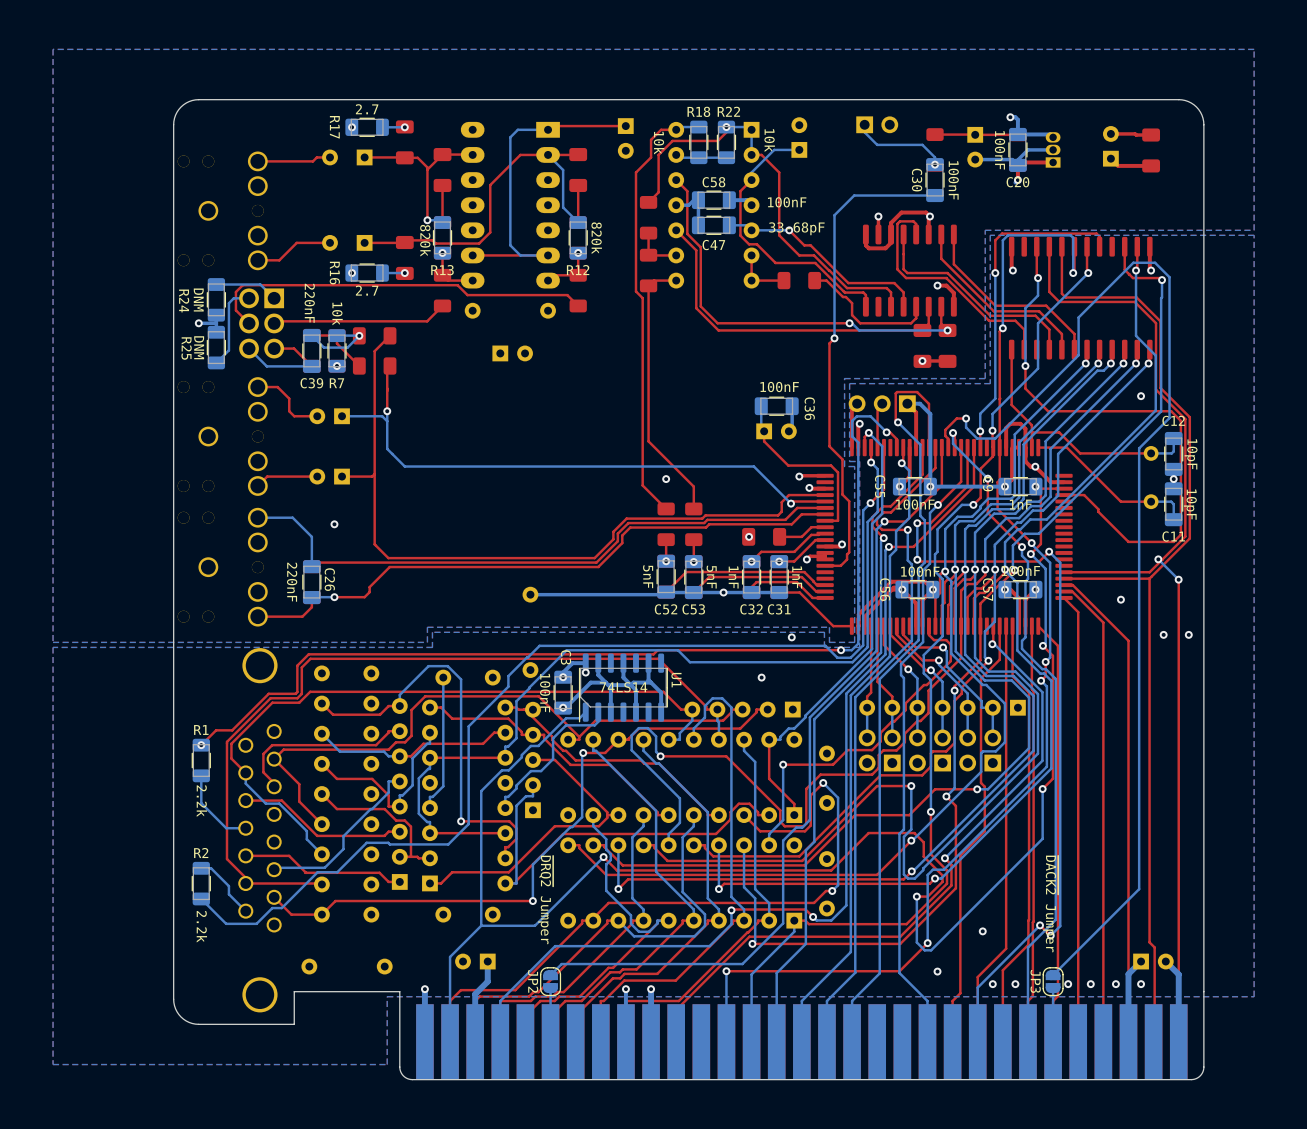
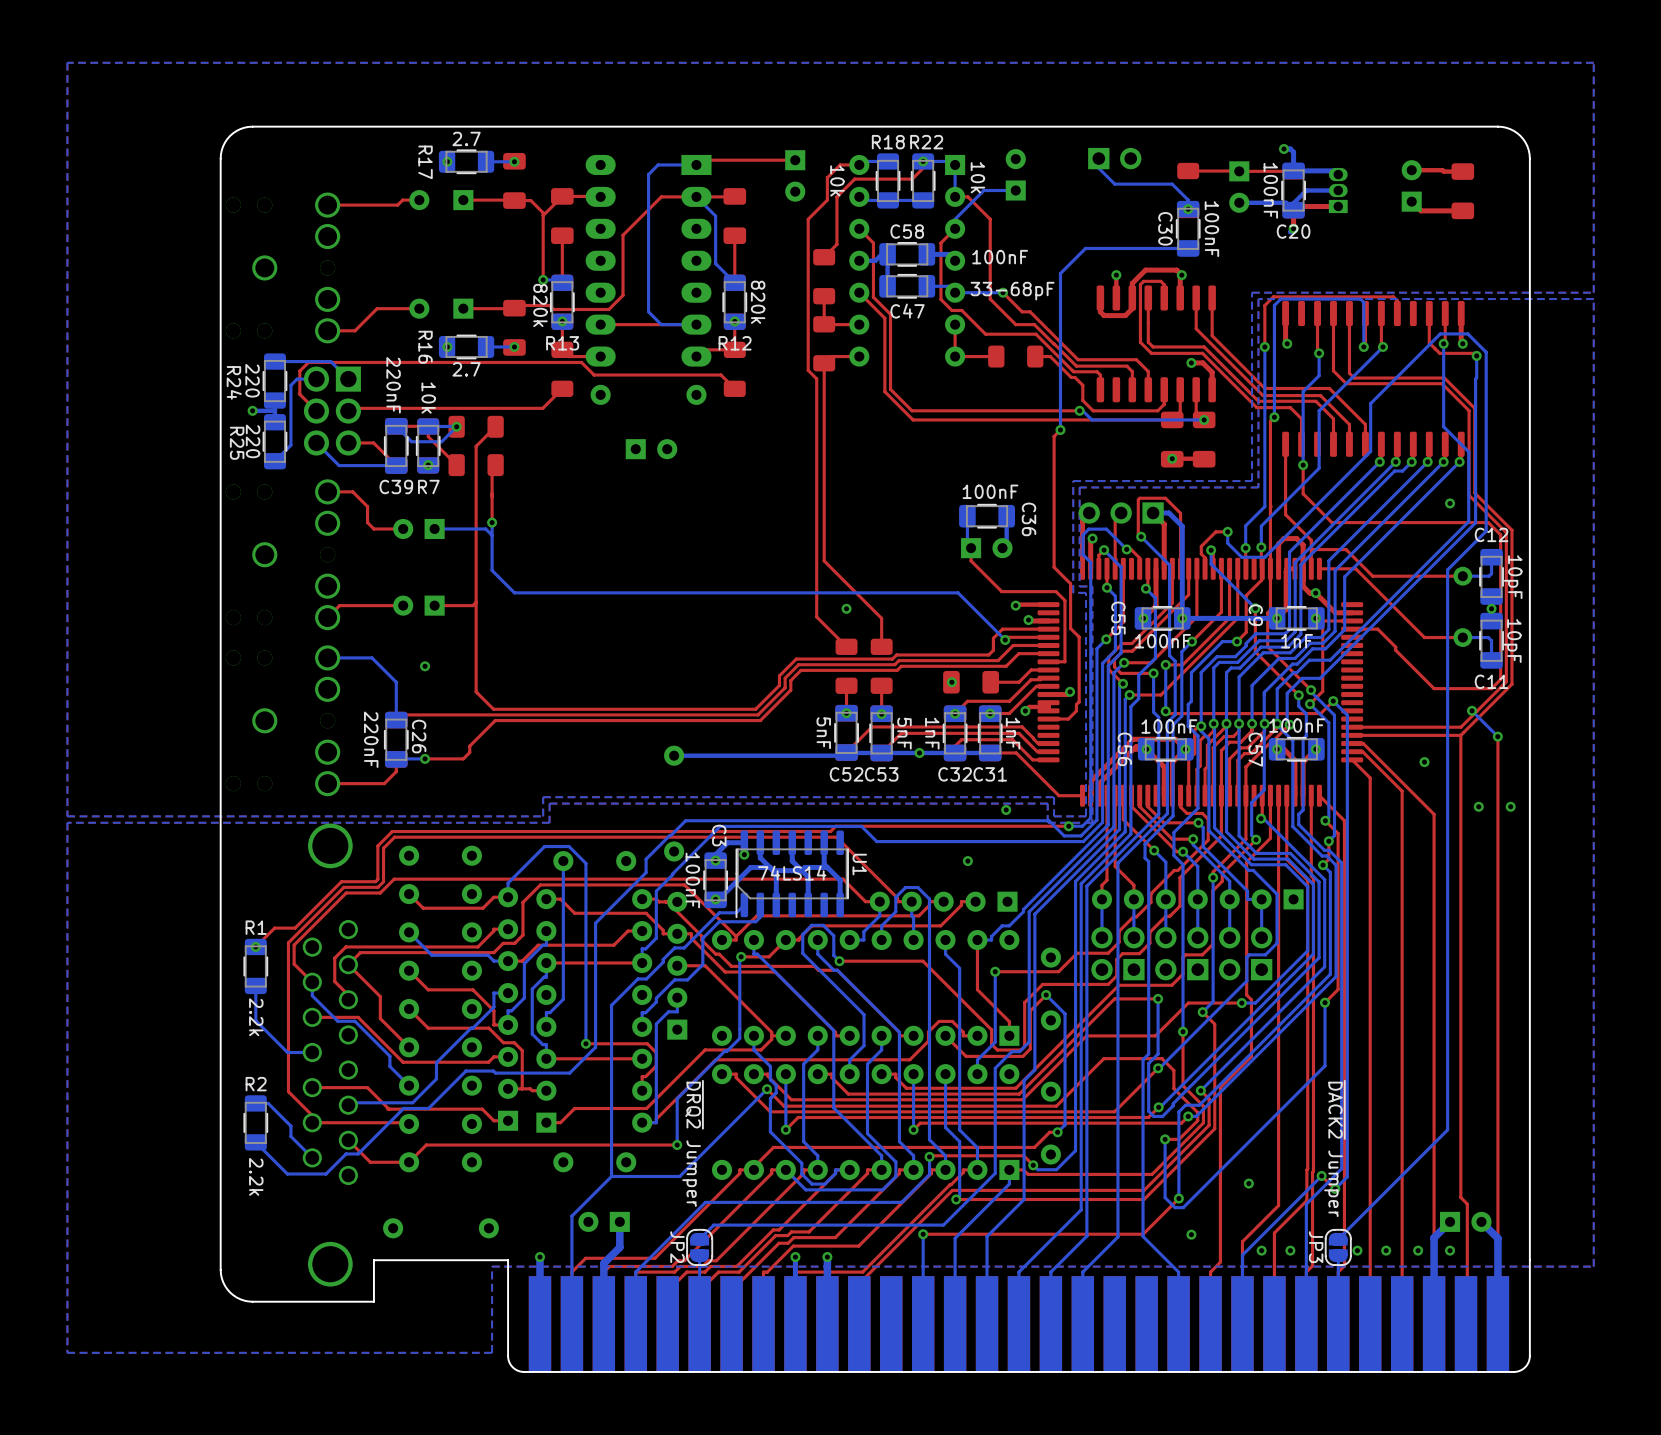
R24 value: DNM (198, 300) -> 220 (252, 380)
R25 value: DNM (199, 347) -> 220 (253, 441)

